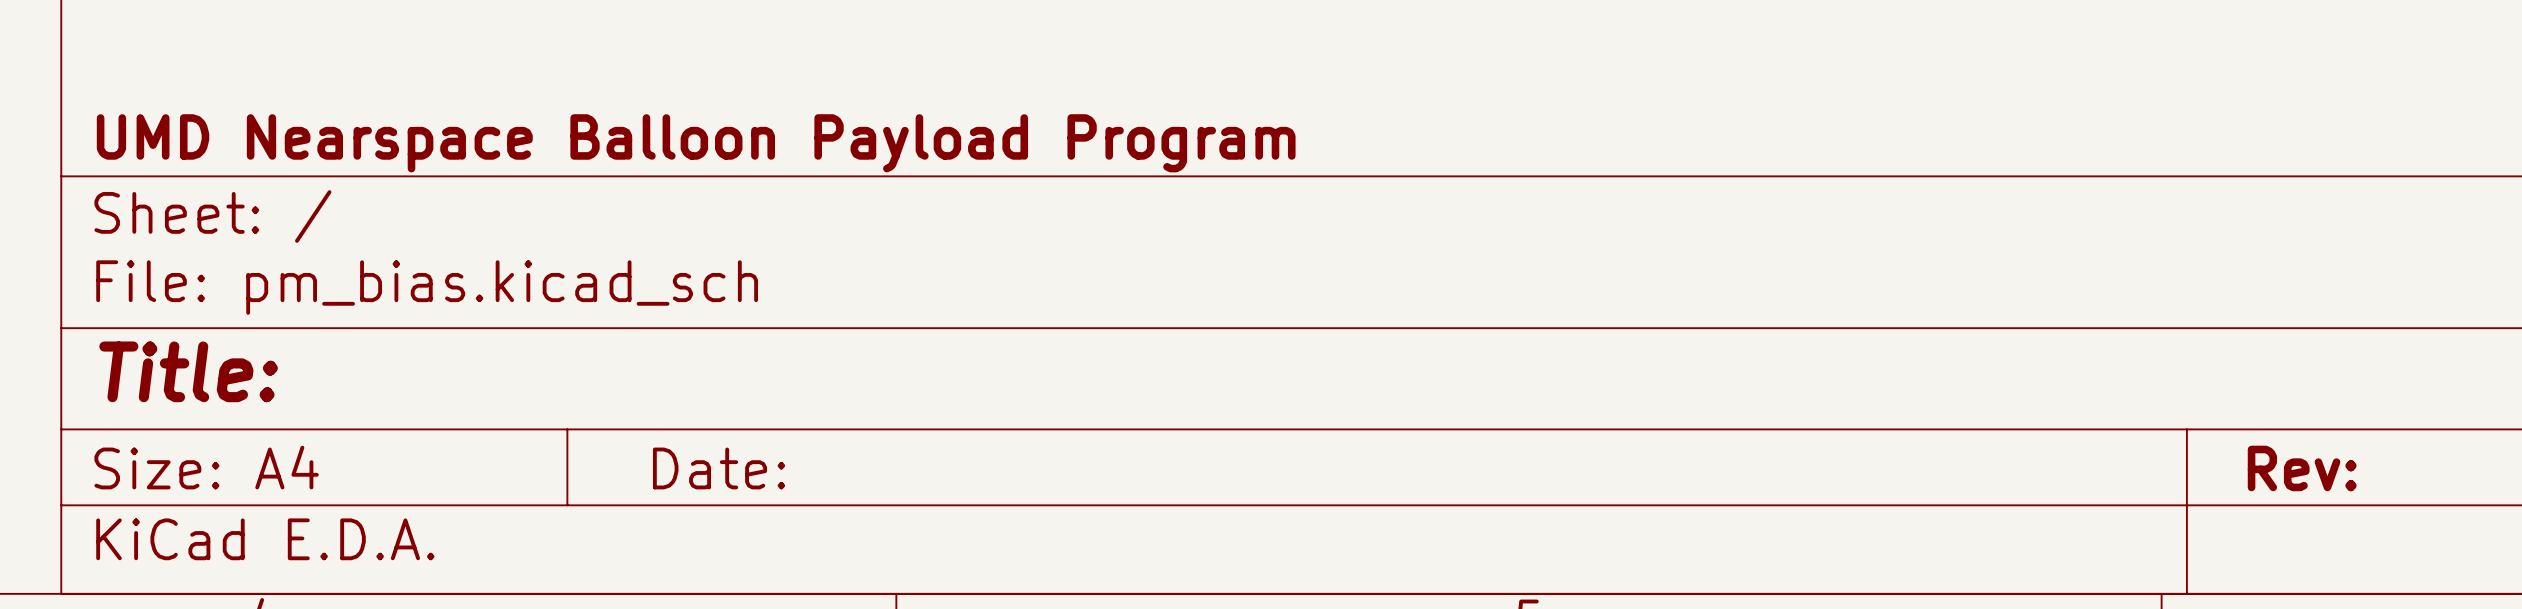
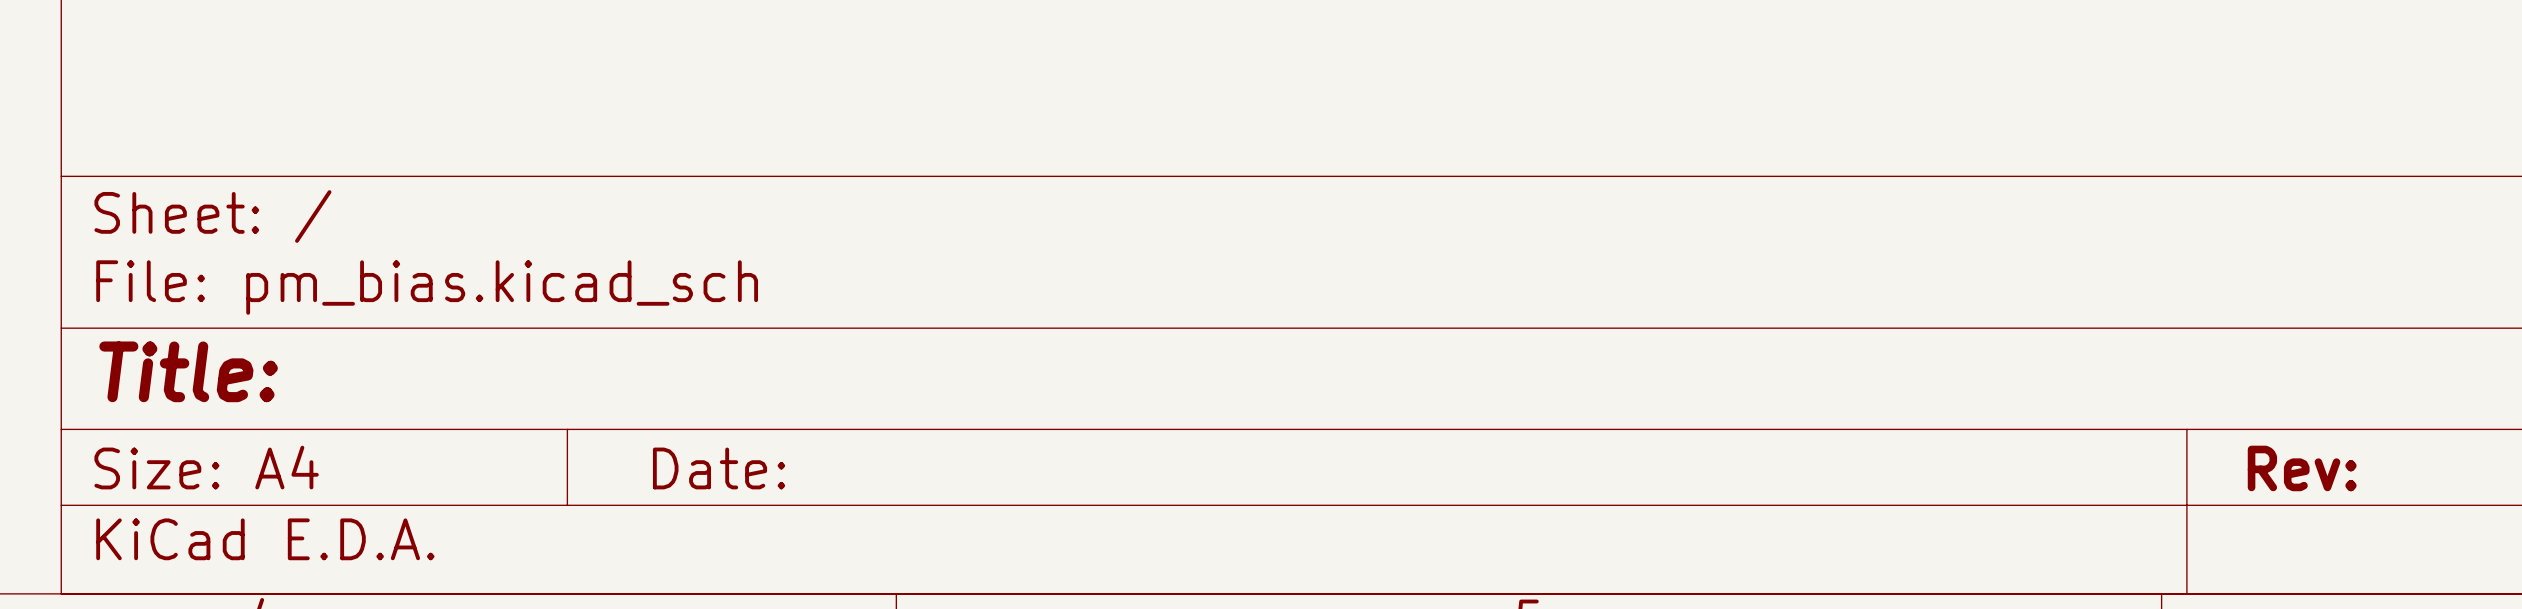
title block: UMD Nearspace Balloon Payload Program (696, 143) -> none

